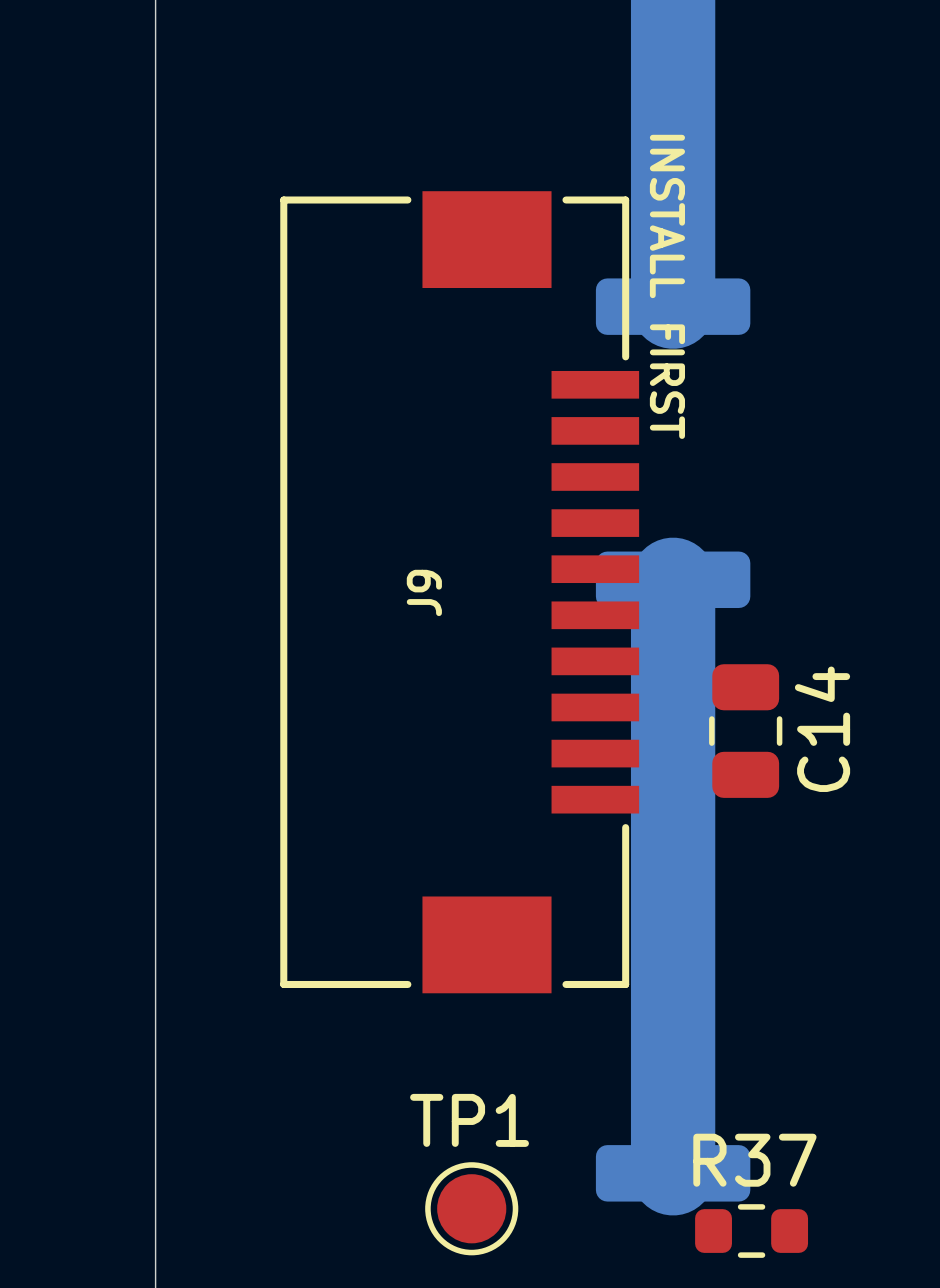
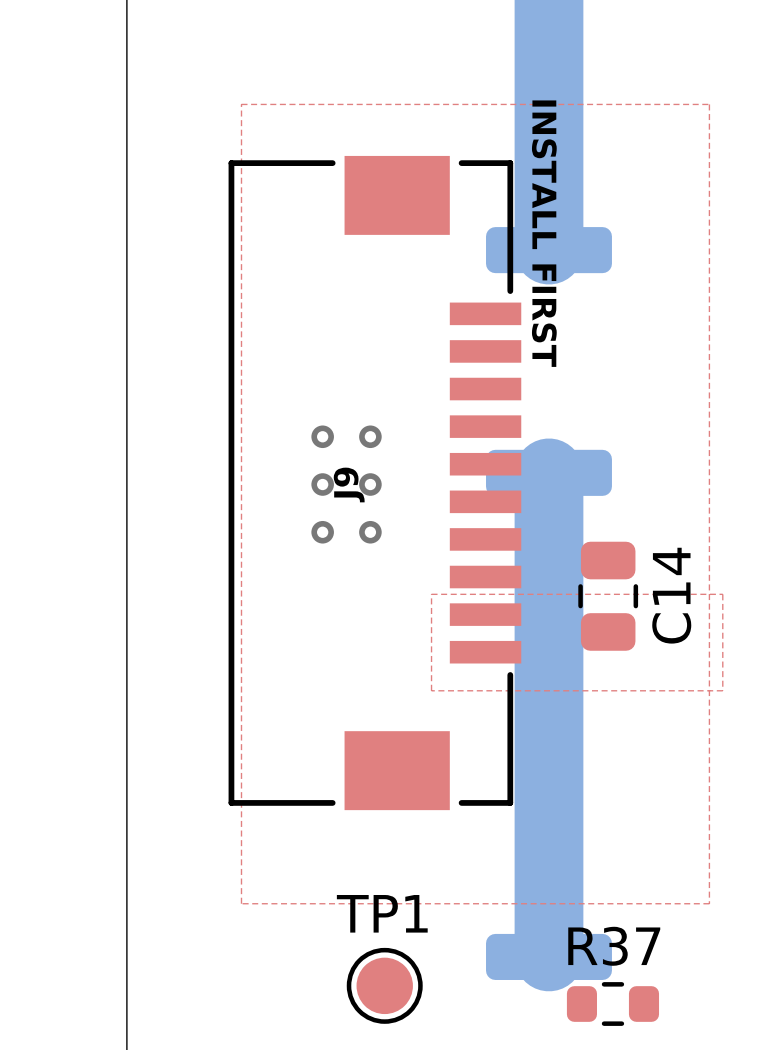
top zone outline: none -> (241, 104) (709, 104) (709, 903) (241, 903) (241, 104)
via: none -> (322, 436)
via: none -> (370, 436)
via: none -> (322, 484)
via: none -> (370, 484)
via: none -> (322, 532)
via: none -> (370, 532)
top zone outline: none -> (431, 594) (722, 594) (722, 690) (431, 690) (431, 594)

